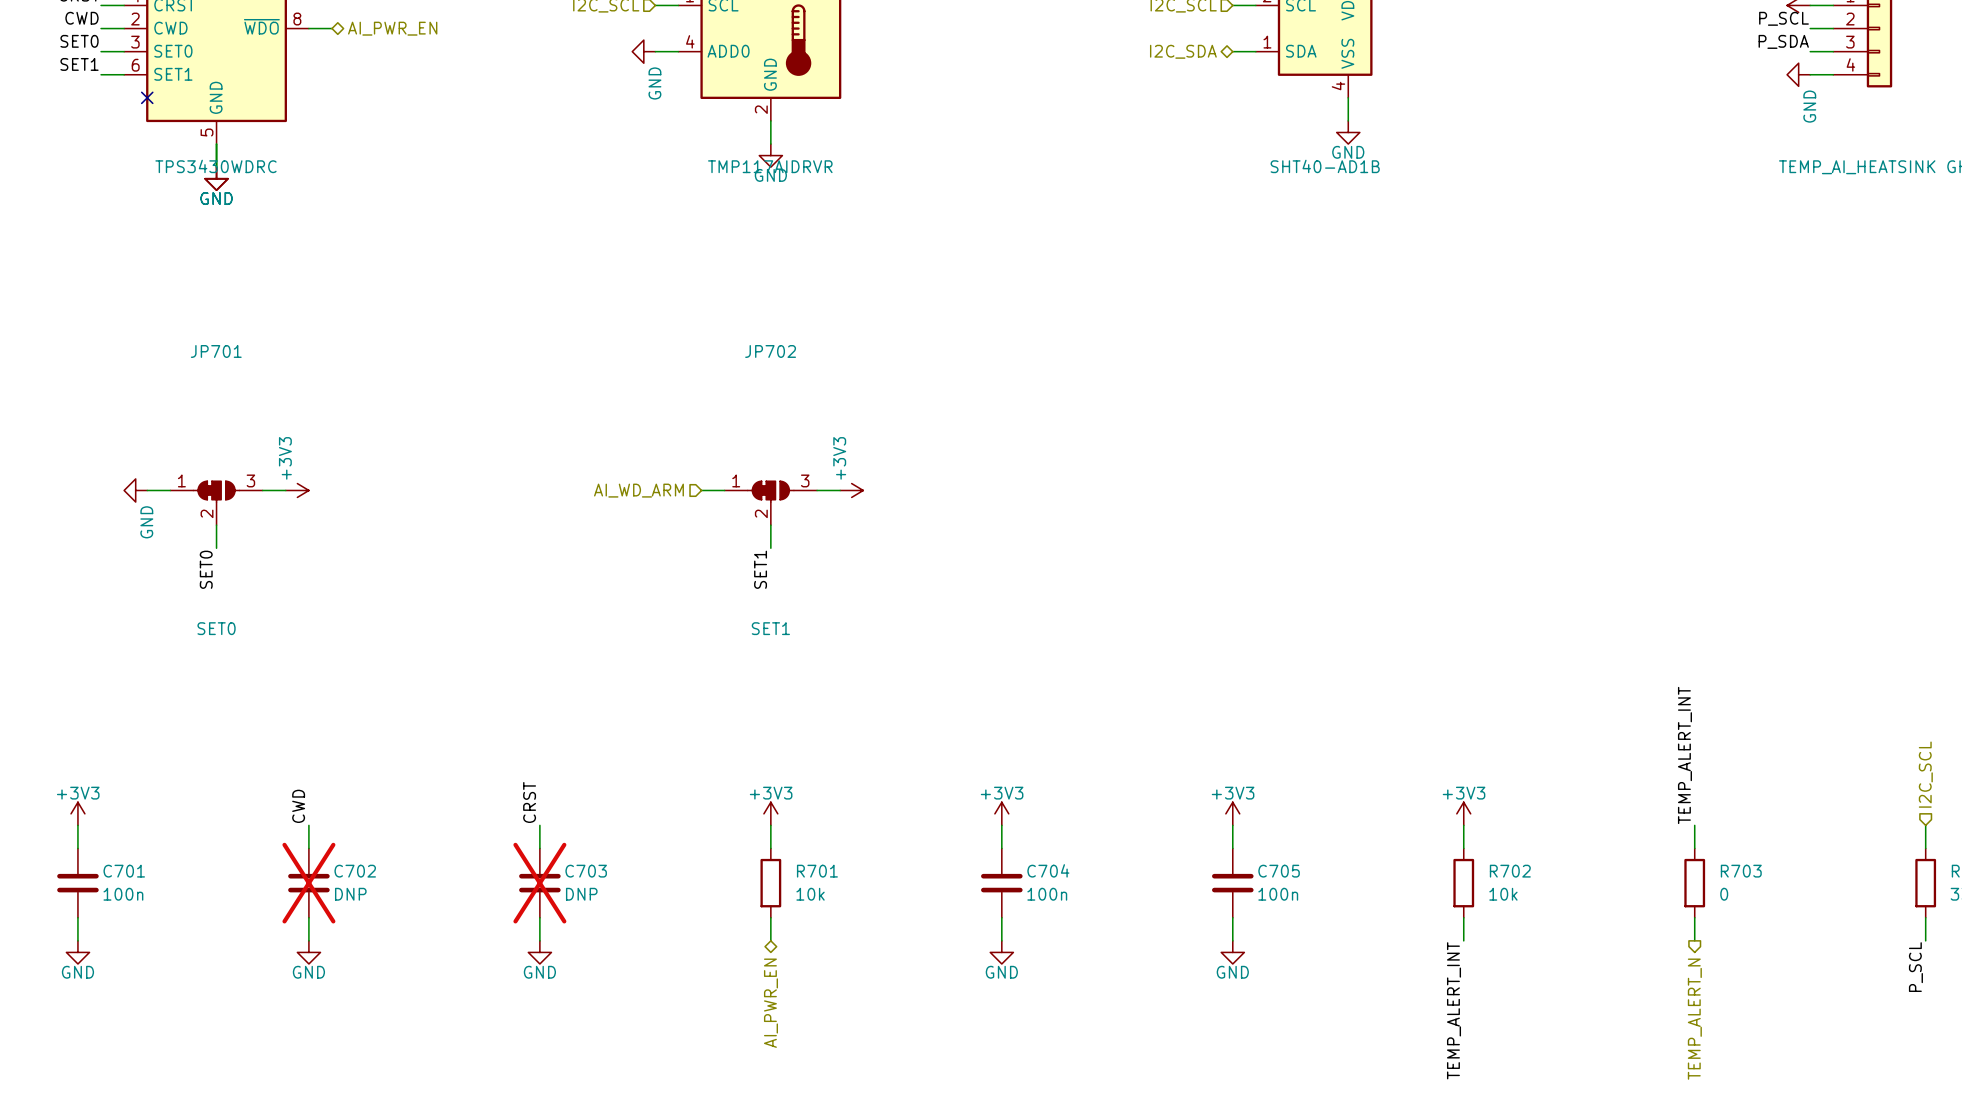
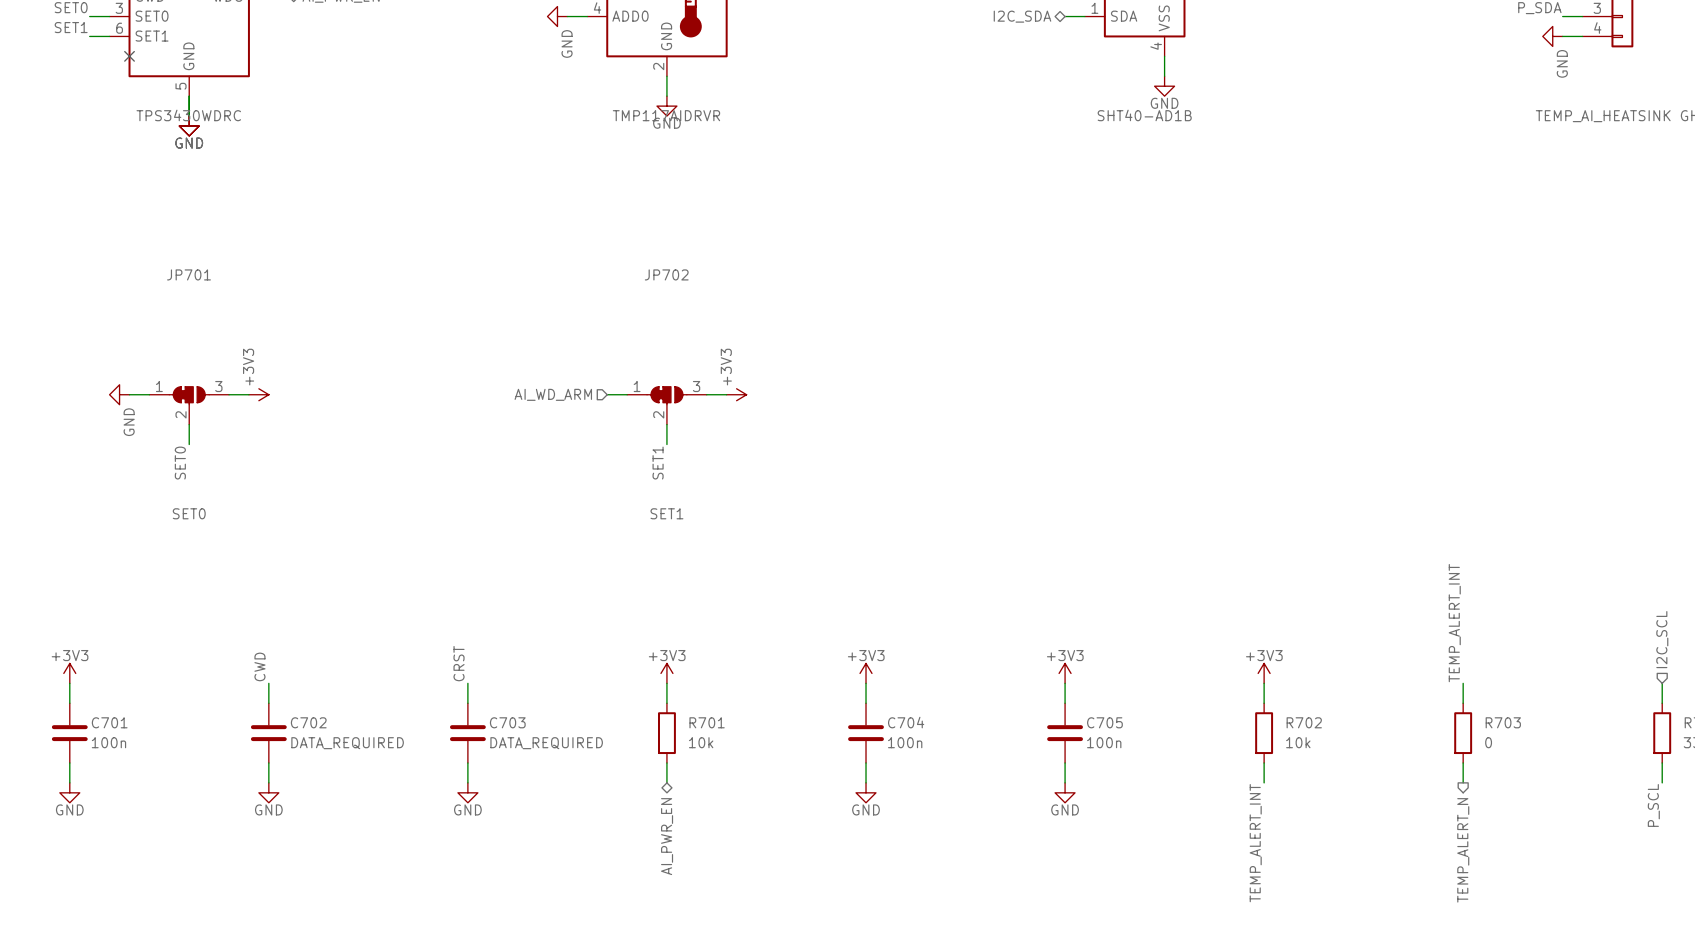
C702 do-not-place cross: (308, 883) -> none
C703 do-not-place cross: (539, 883) -> none
C702 value: DNP (350, 894) -> DATA_REQUIRED (347, 743)
C703 value: DNP (581, 894) -> DATA_REQUIRED (546, 743)

